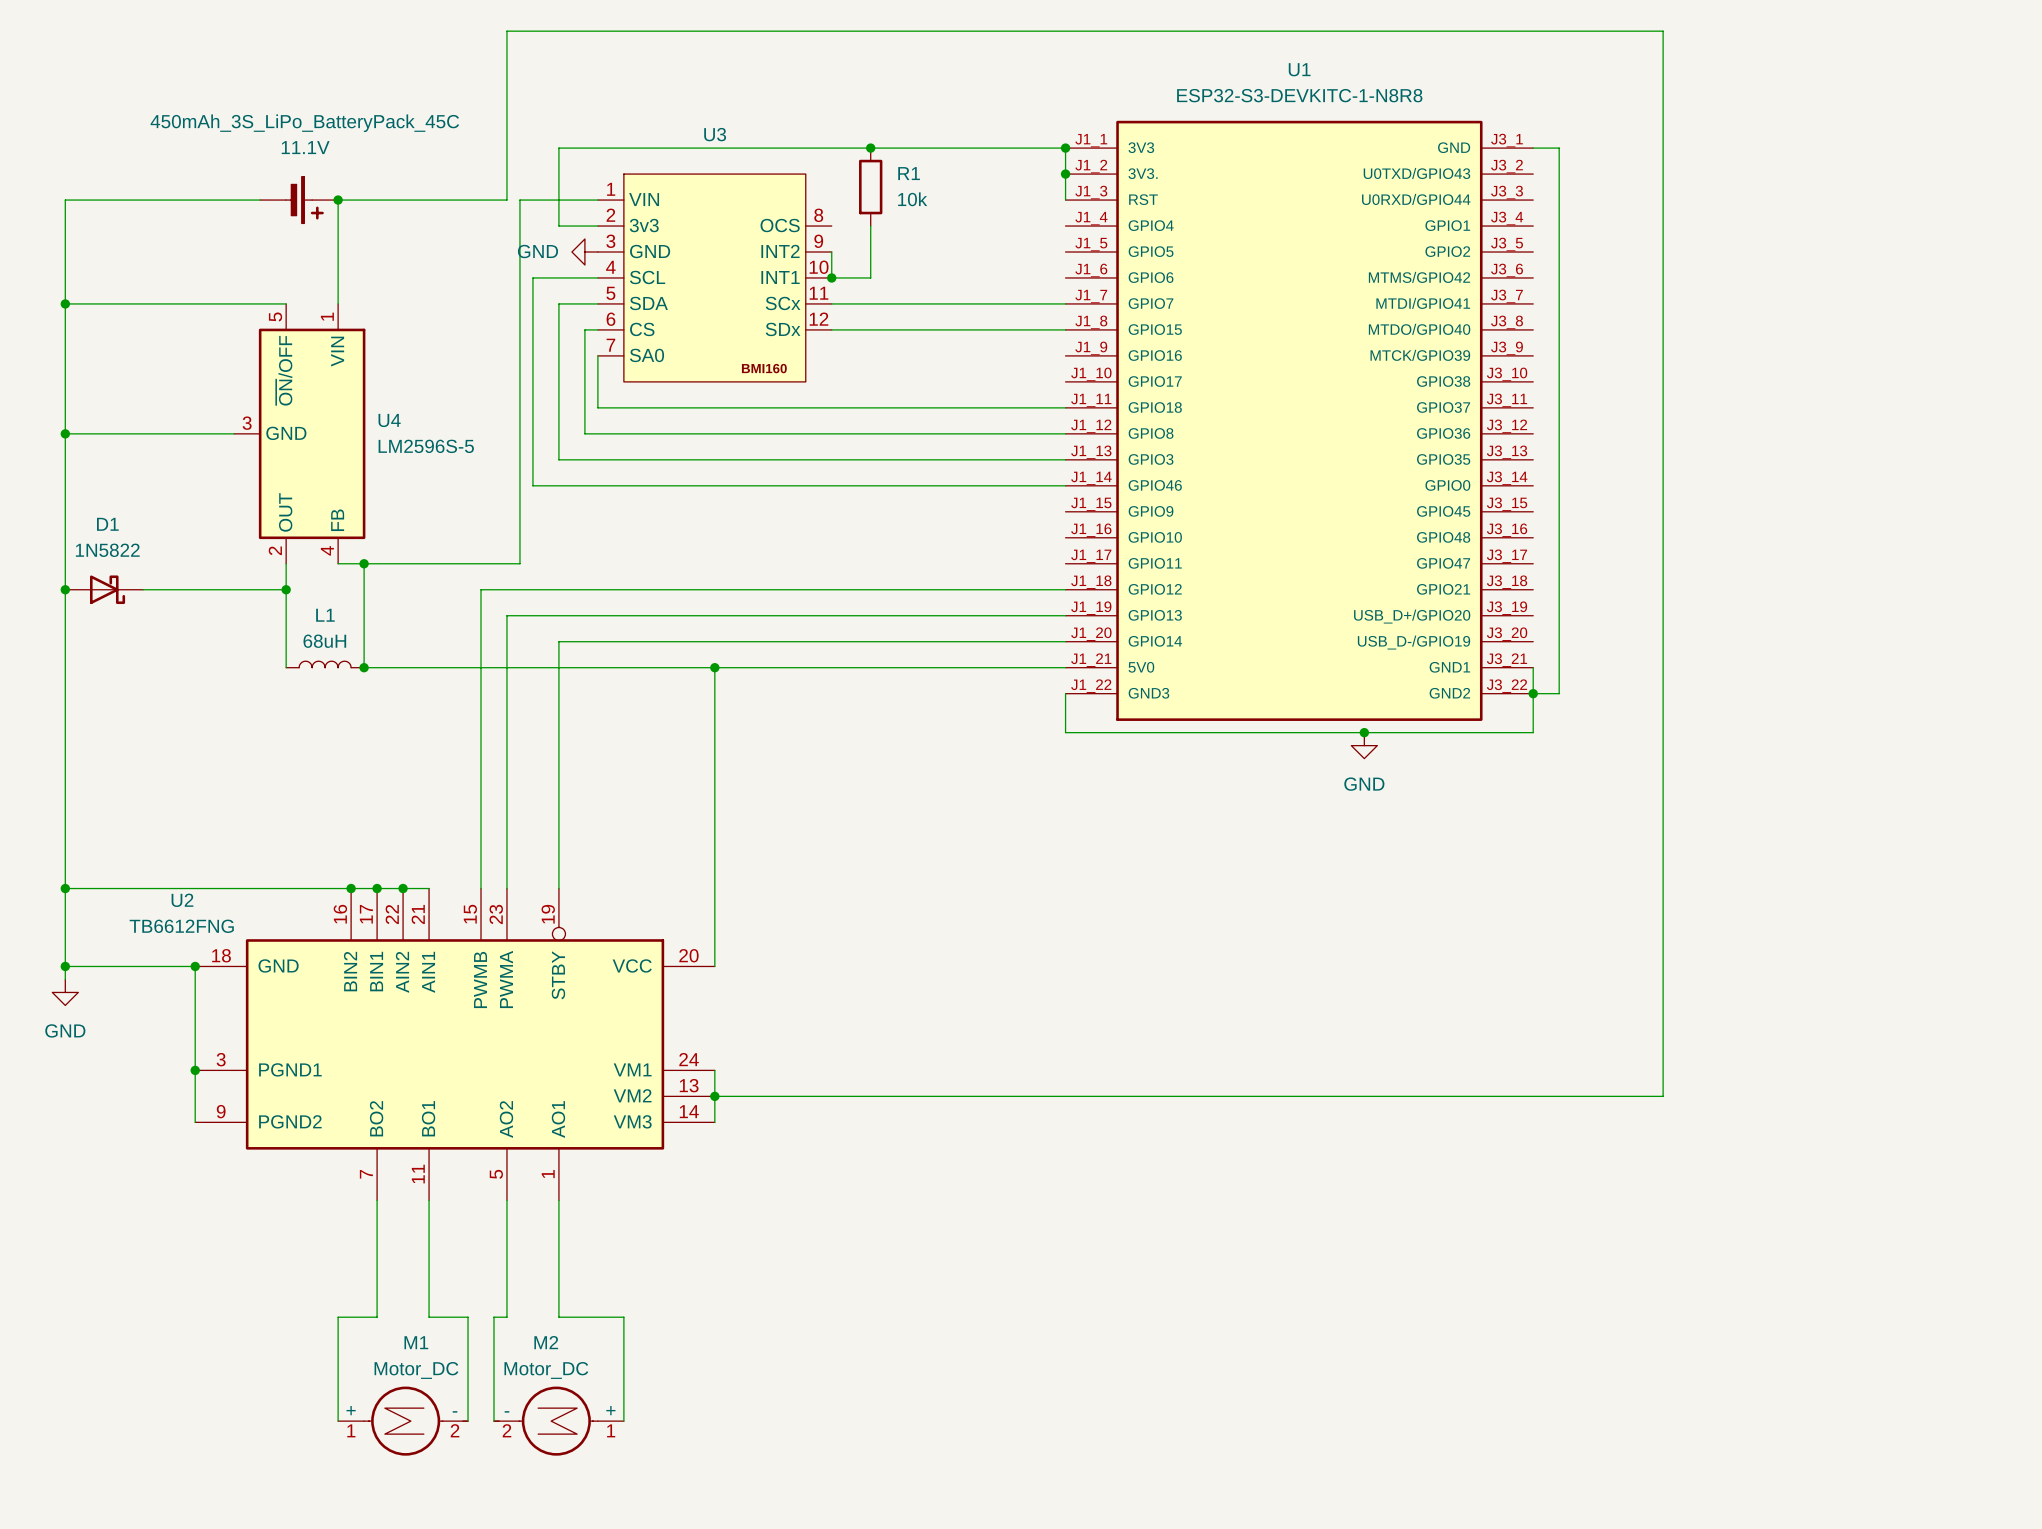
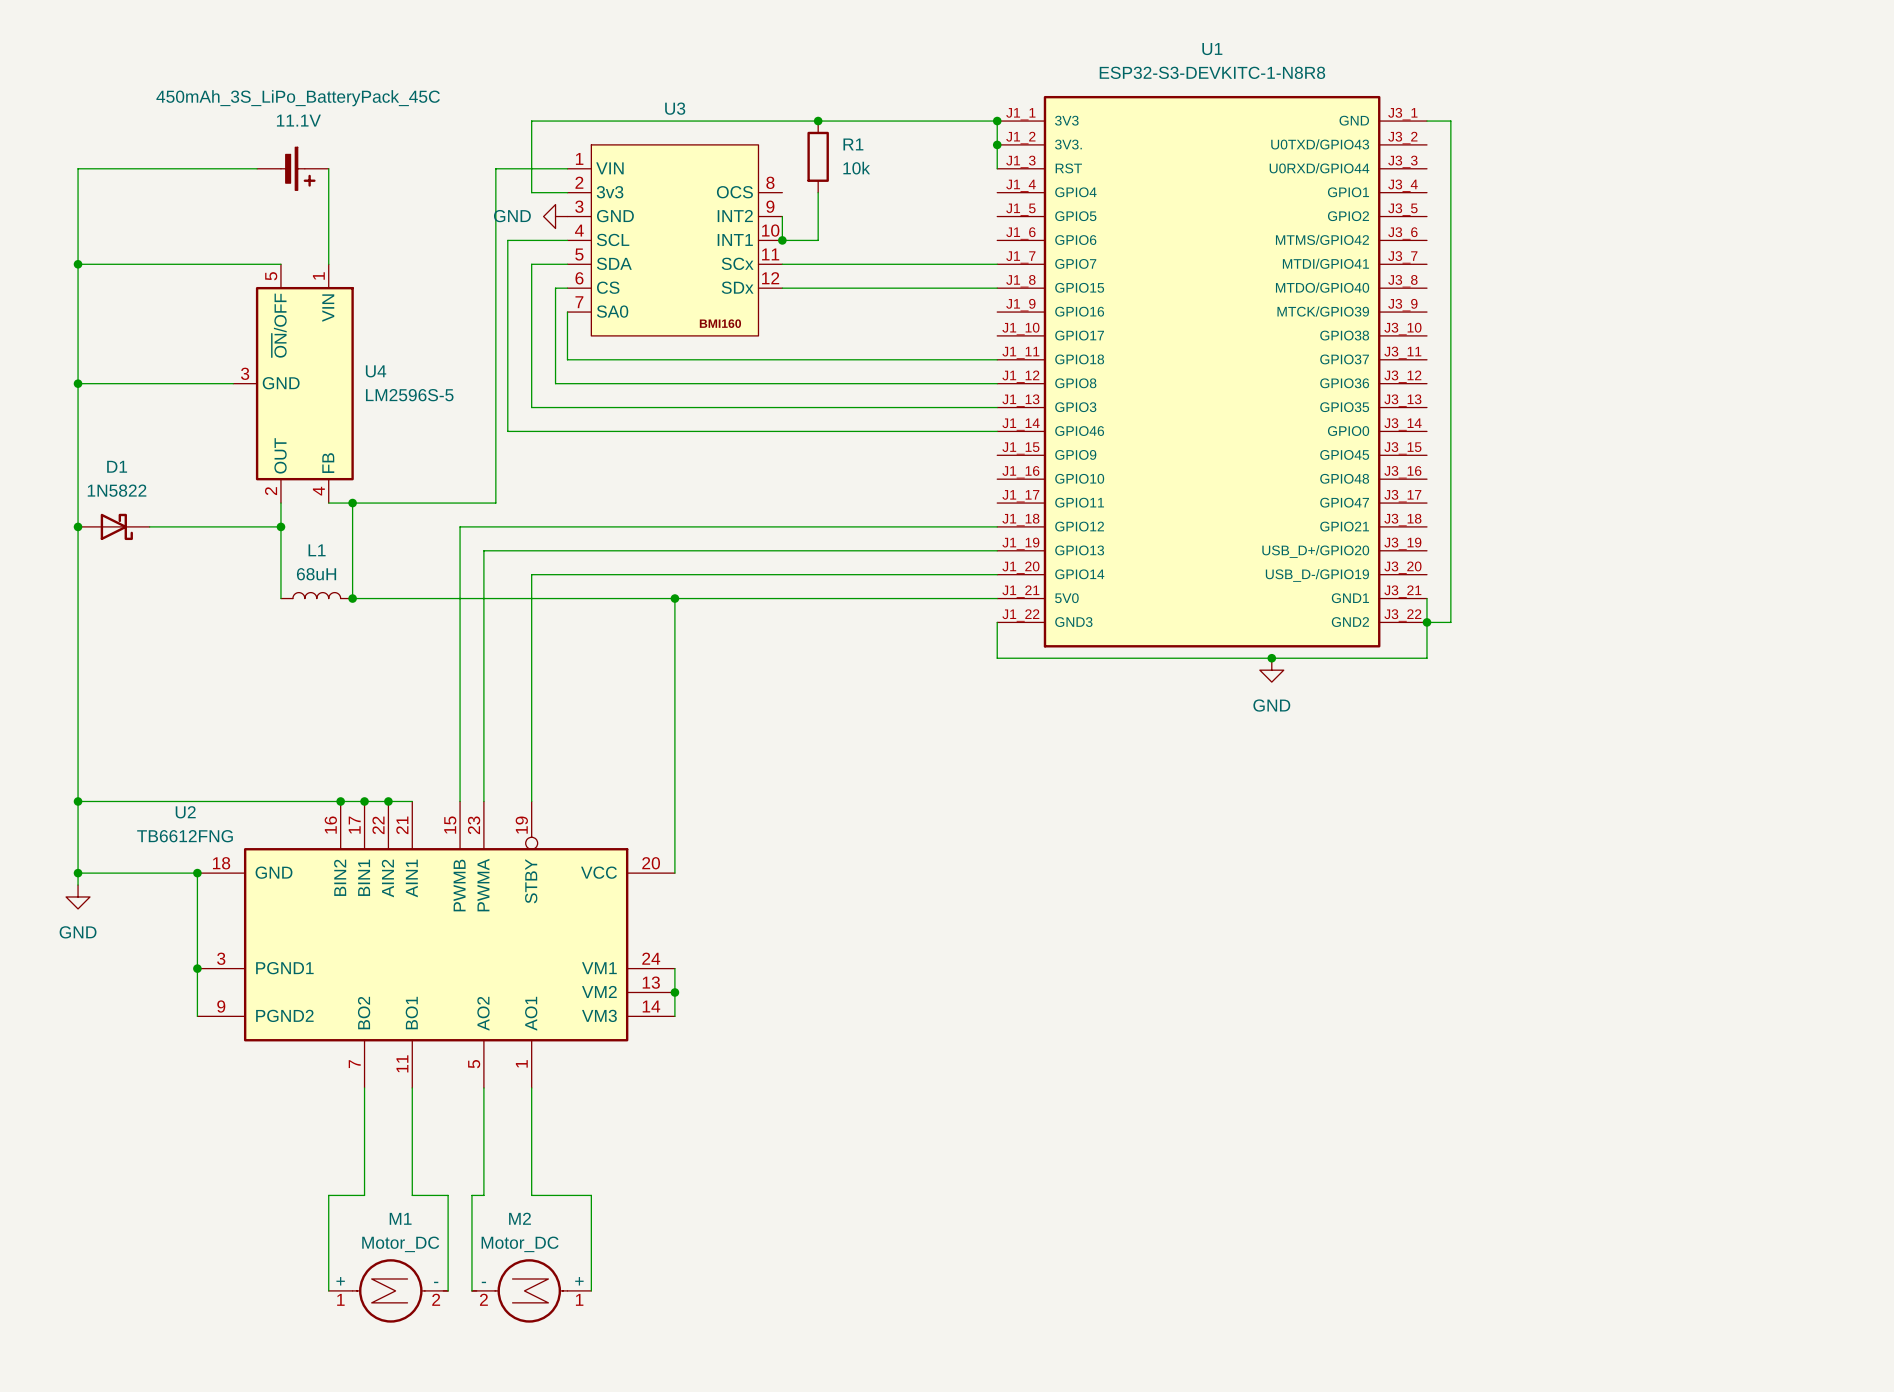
wire: (338, 200) (506, 200) (506, 31) (1663, 31) (1663, 1096) (714, 1096) -> none
junction: (338, 200) -> none

